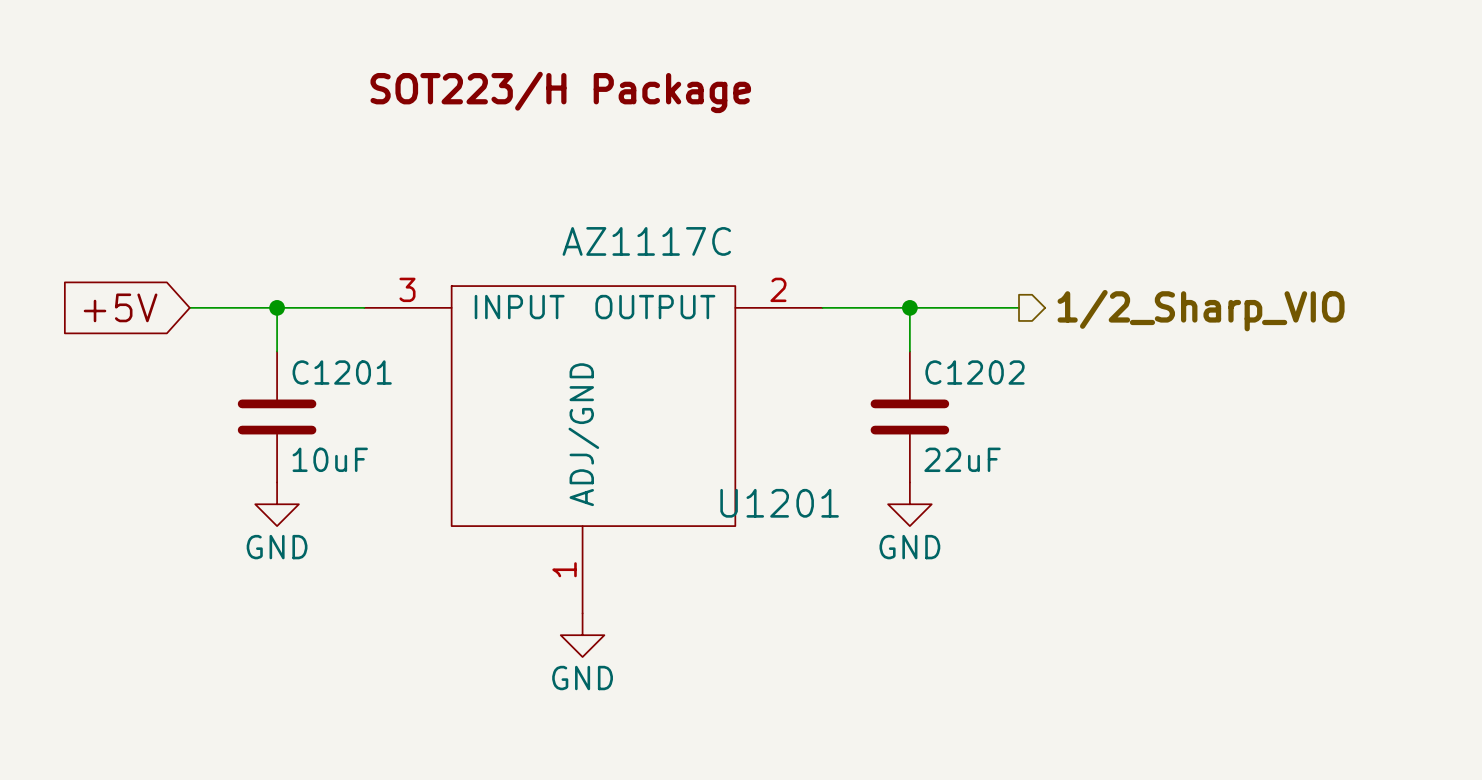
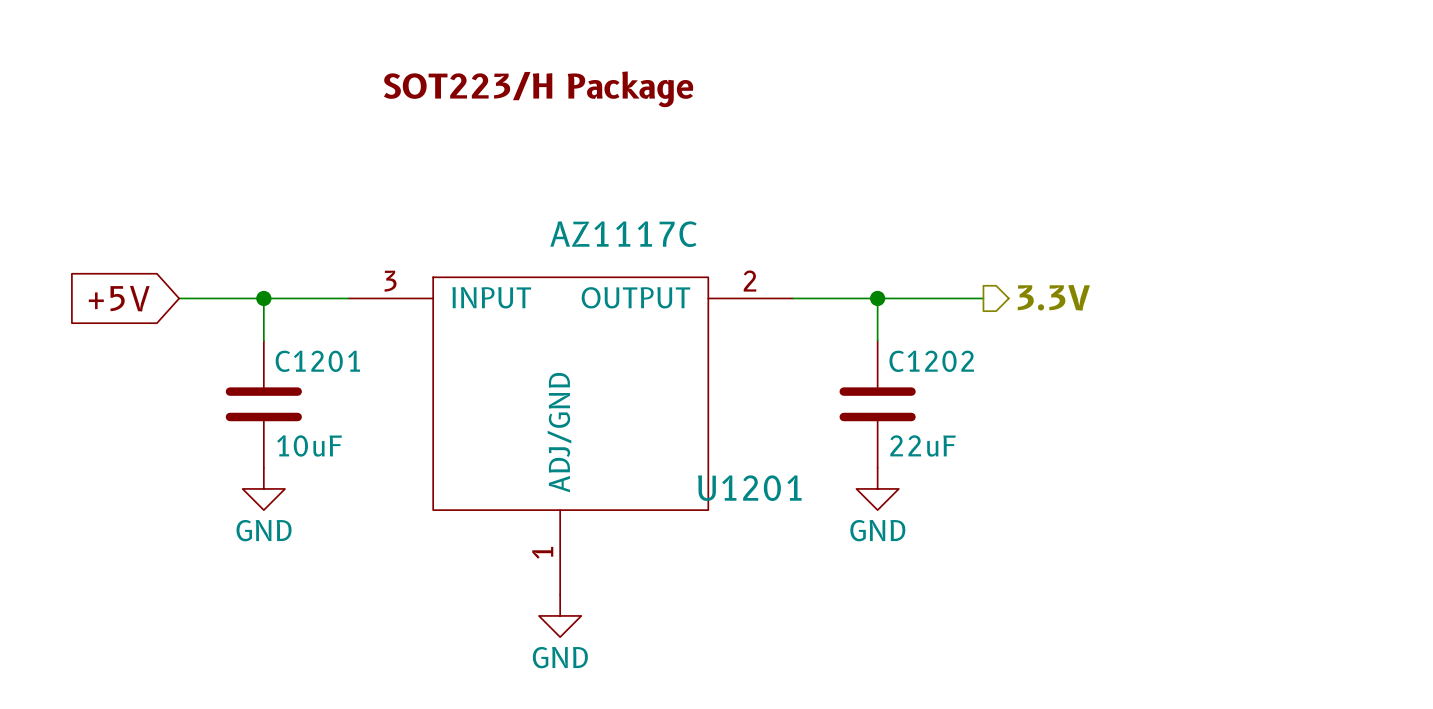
hierarchical label: 1/2_Sharp_VIO (1201, 310) -> 3.3V (1053, 297)

